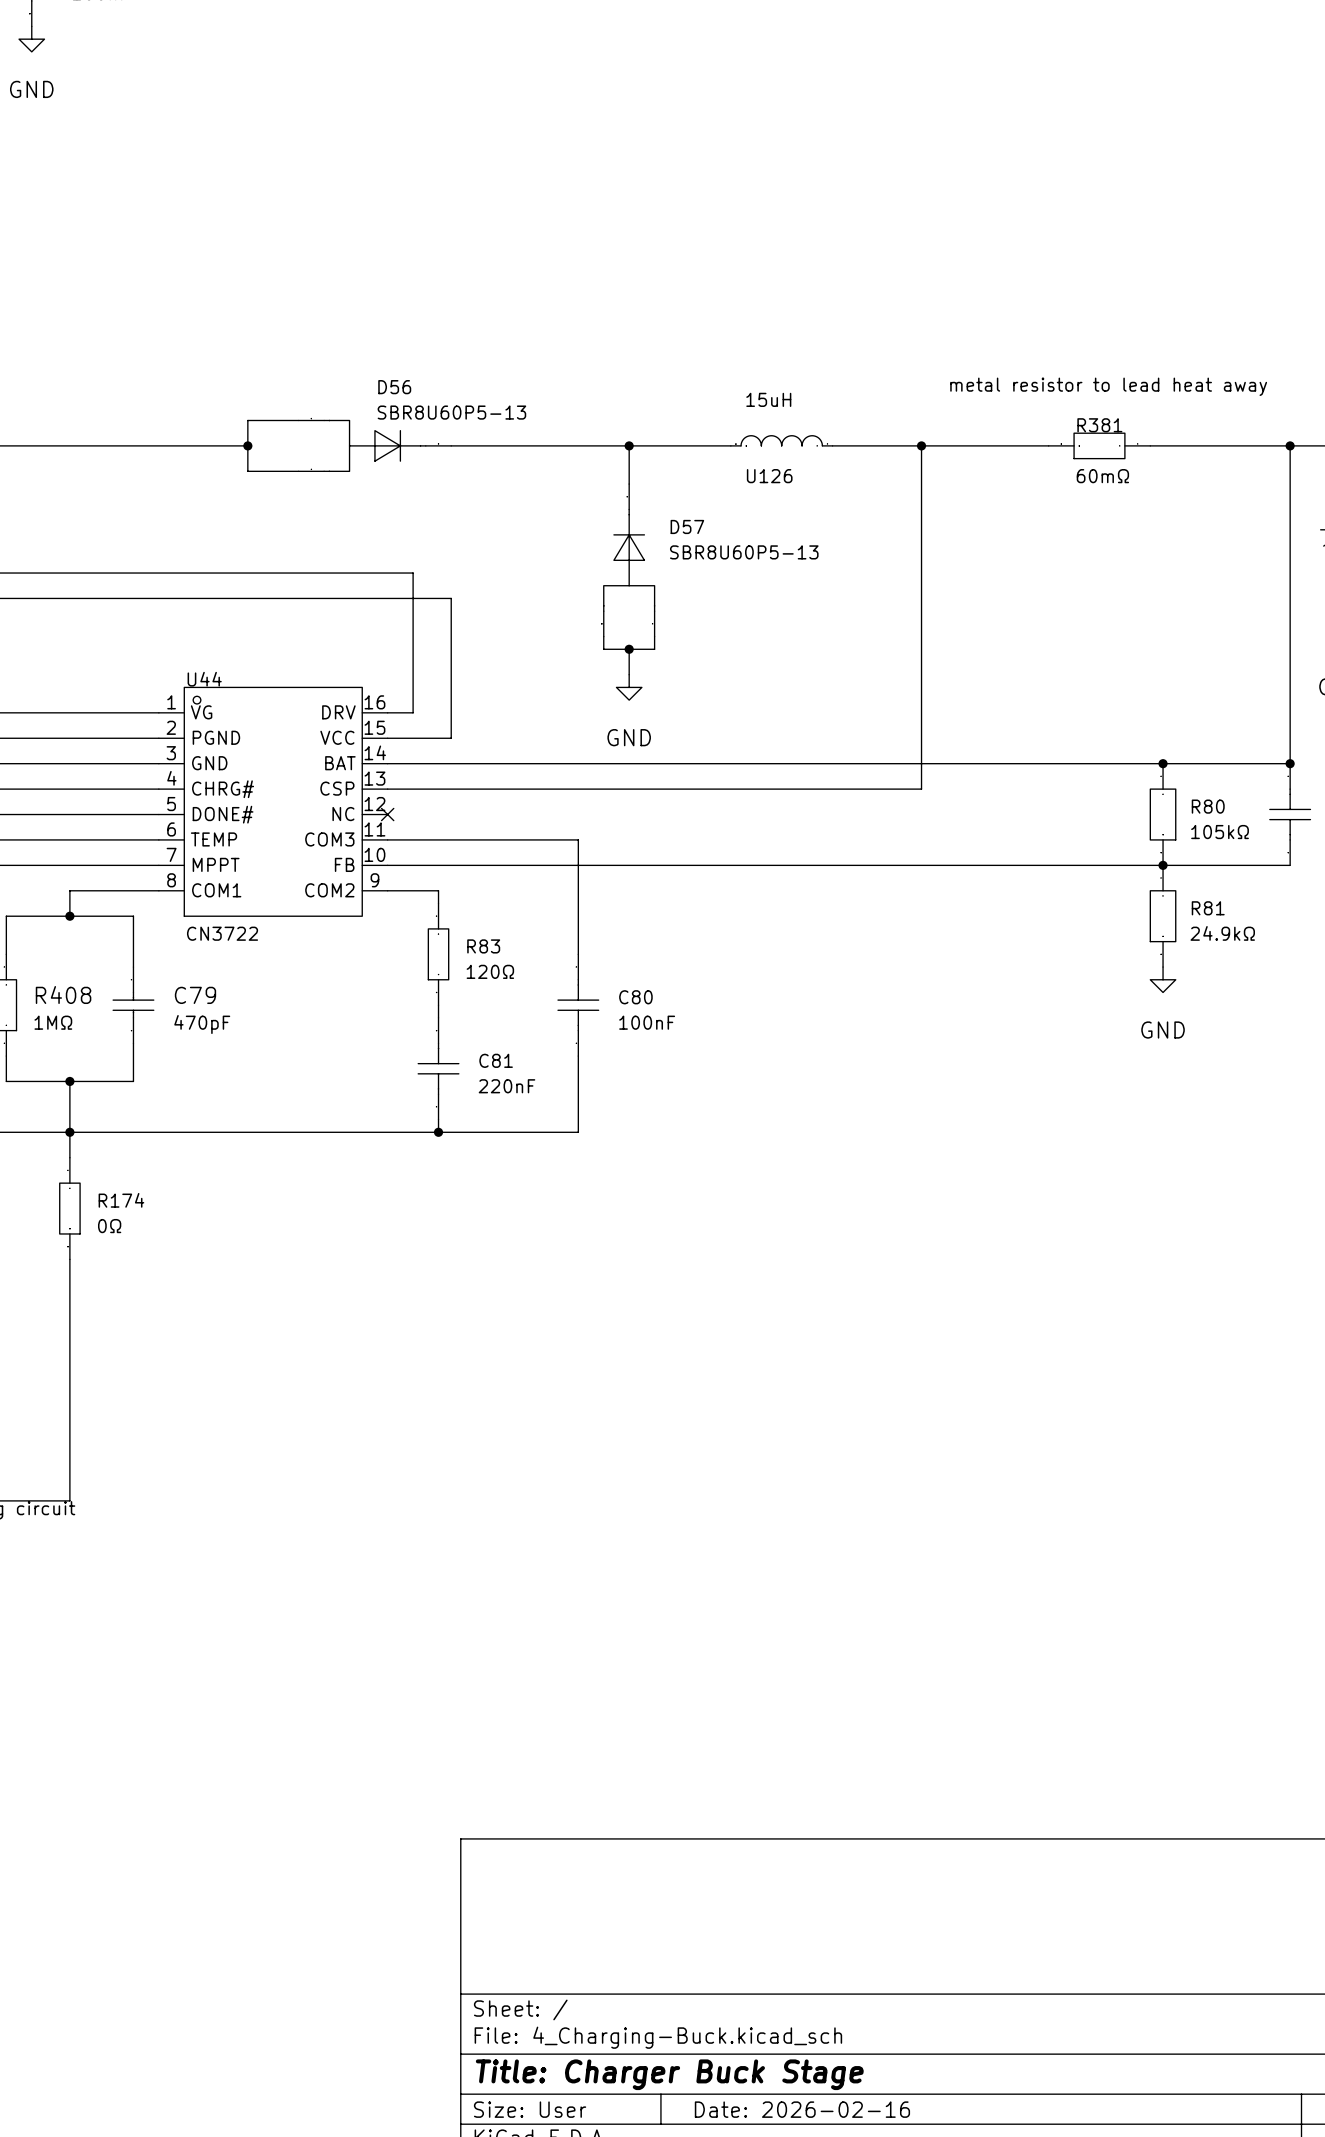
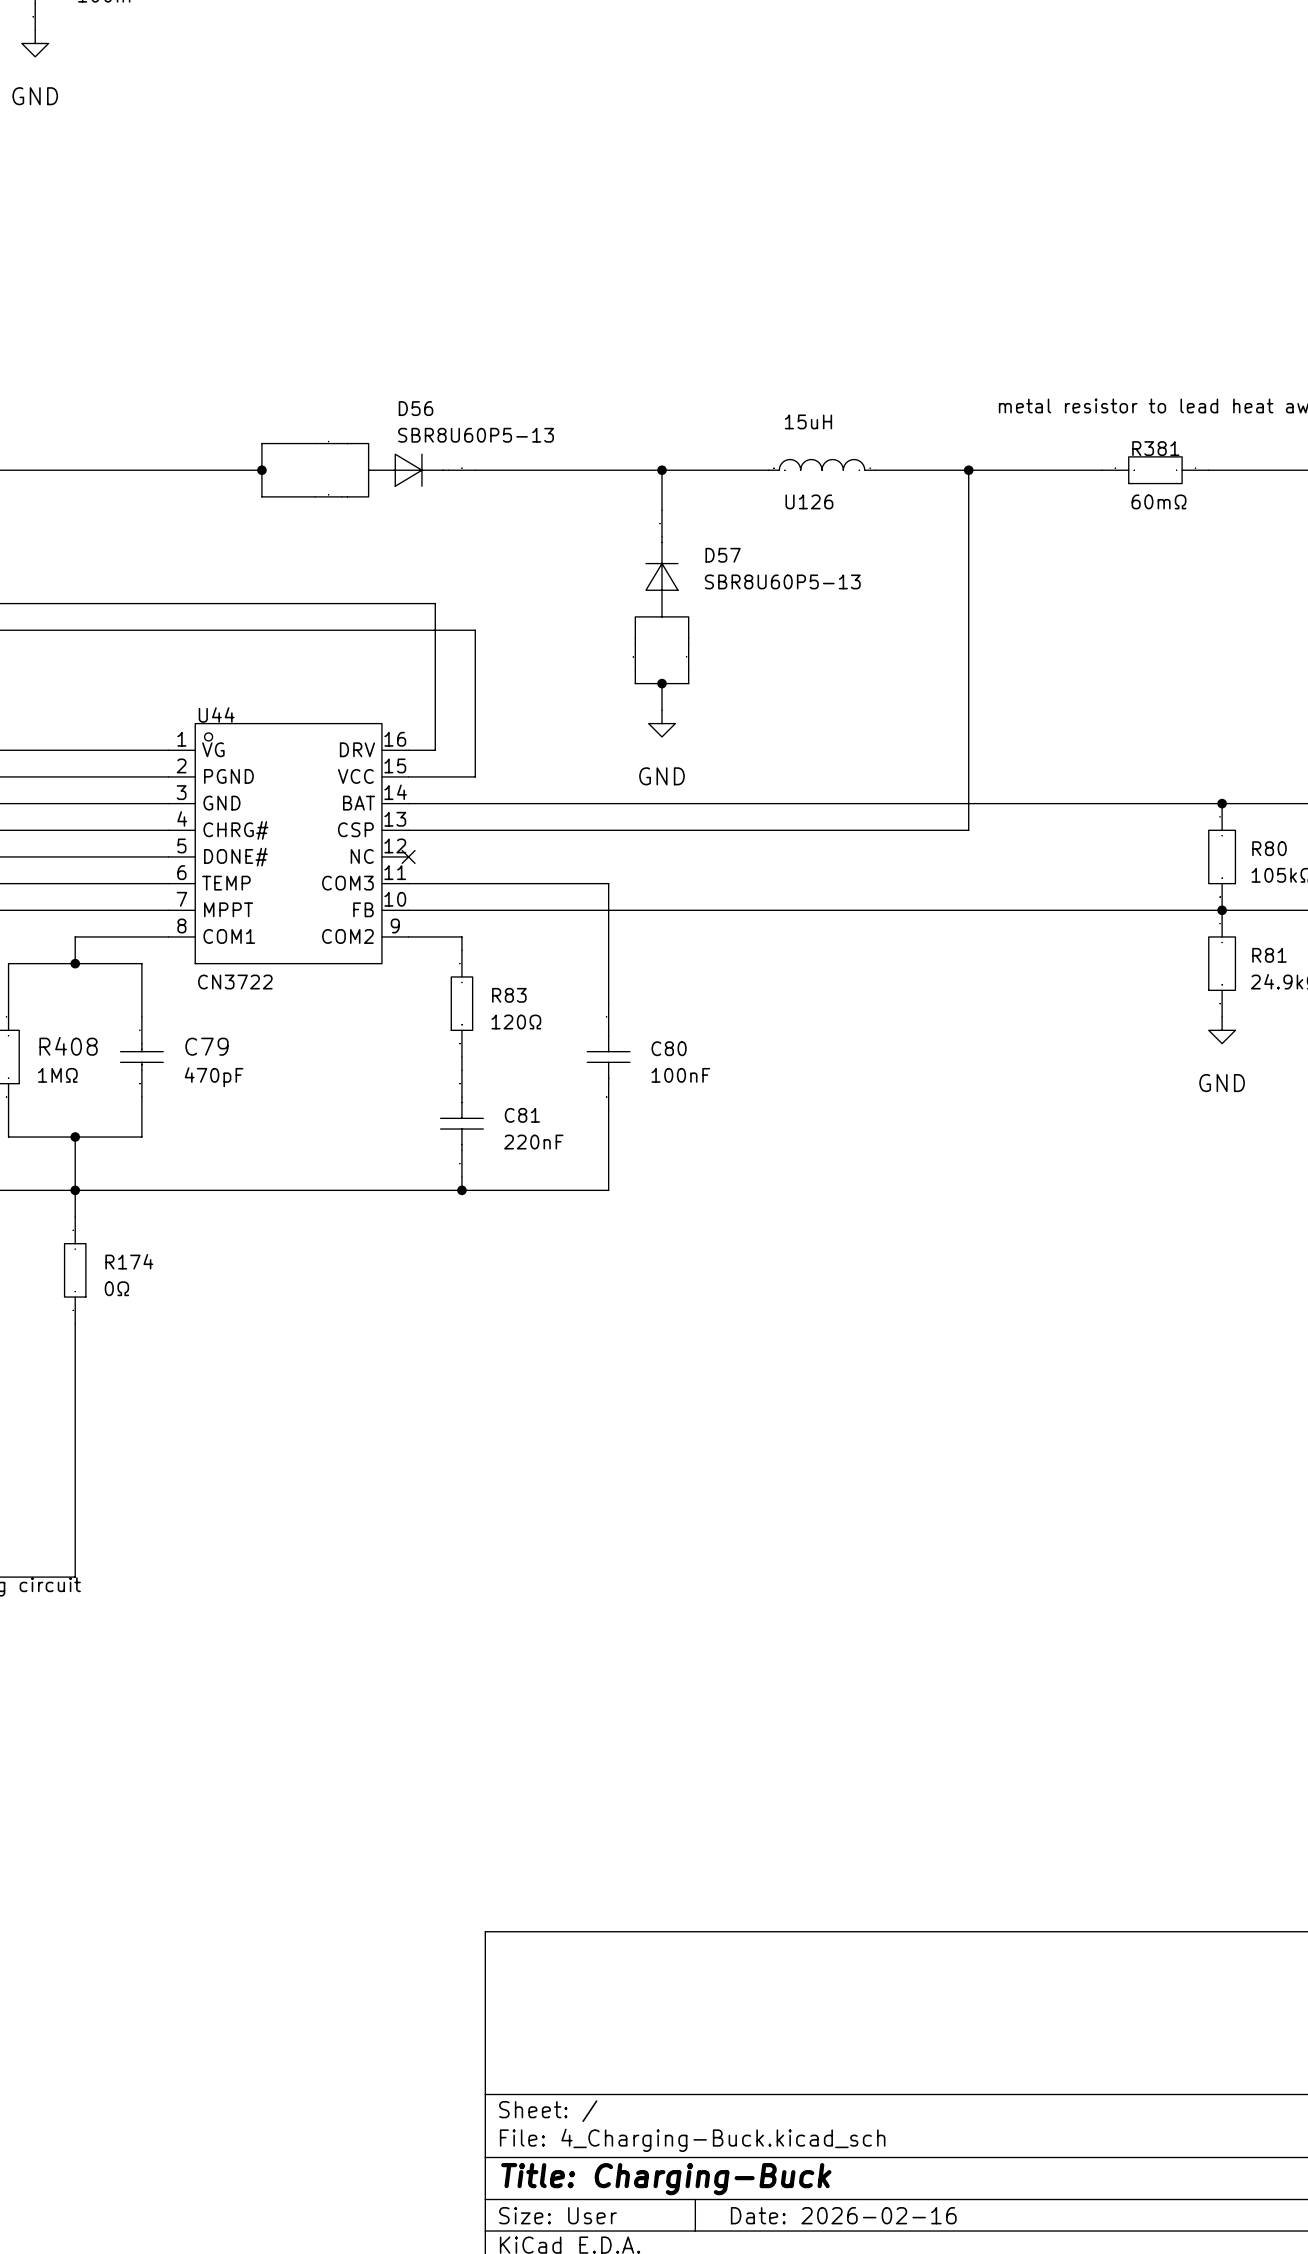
title block: Title: Charger Buck Stage (669, 2074) -> Title: Charging-Buck (666, 2179)

